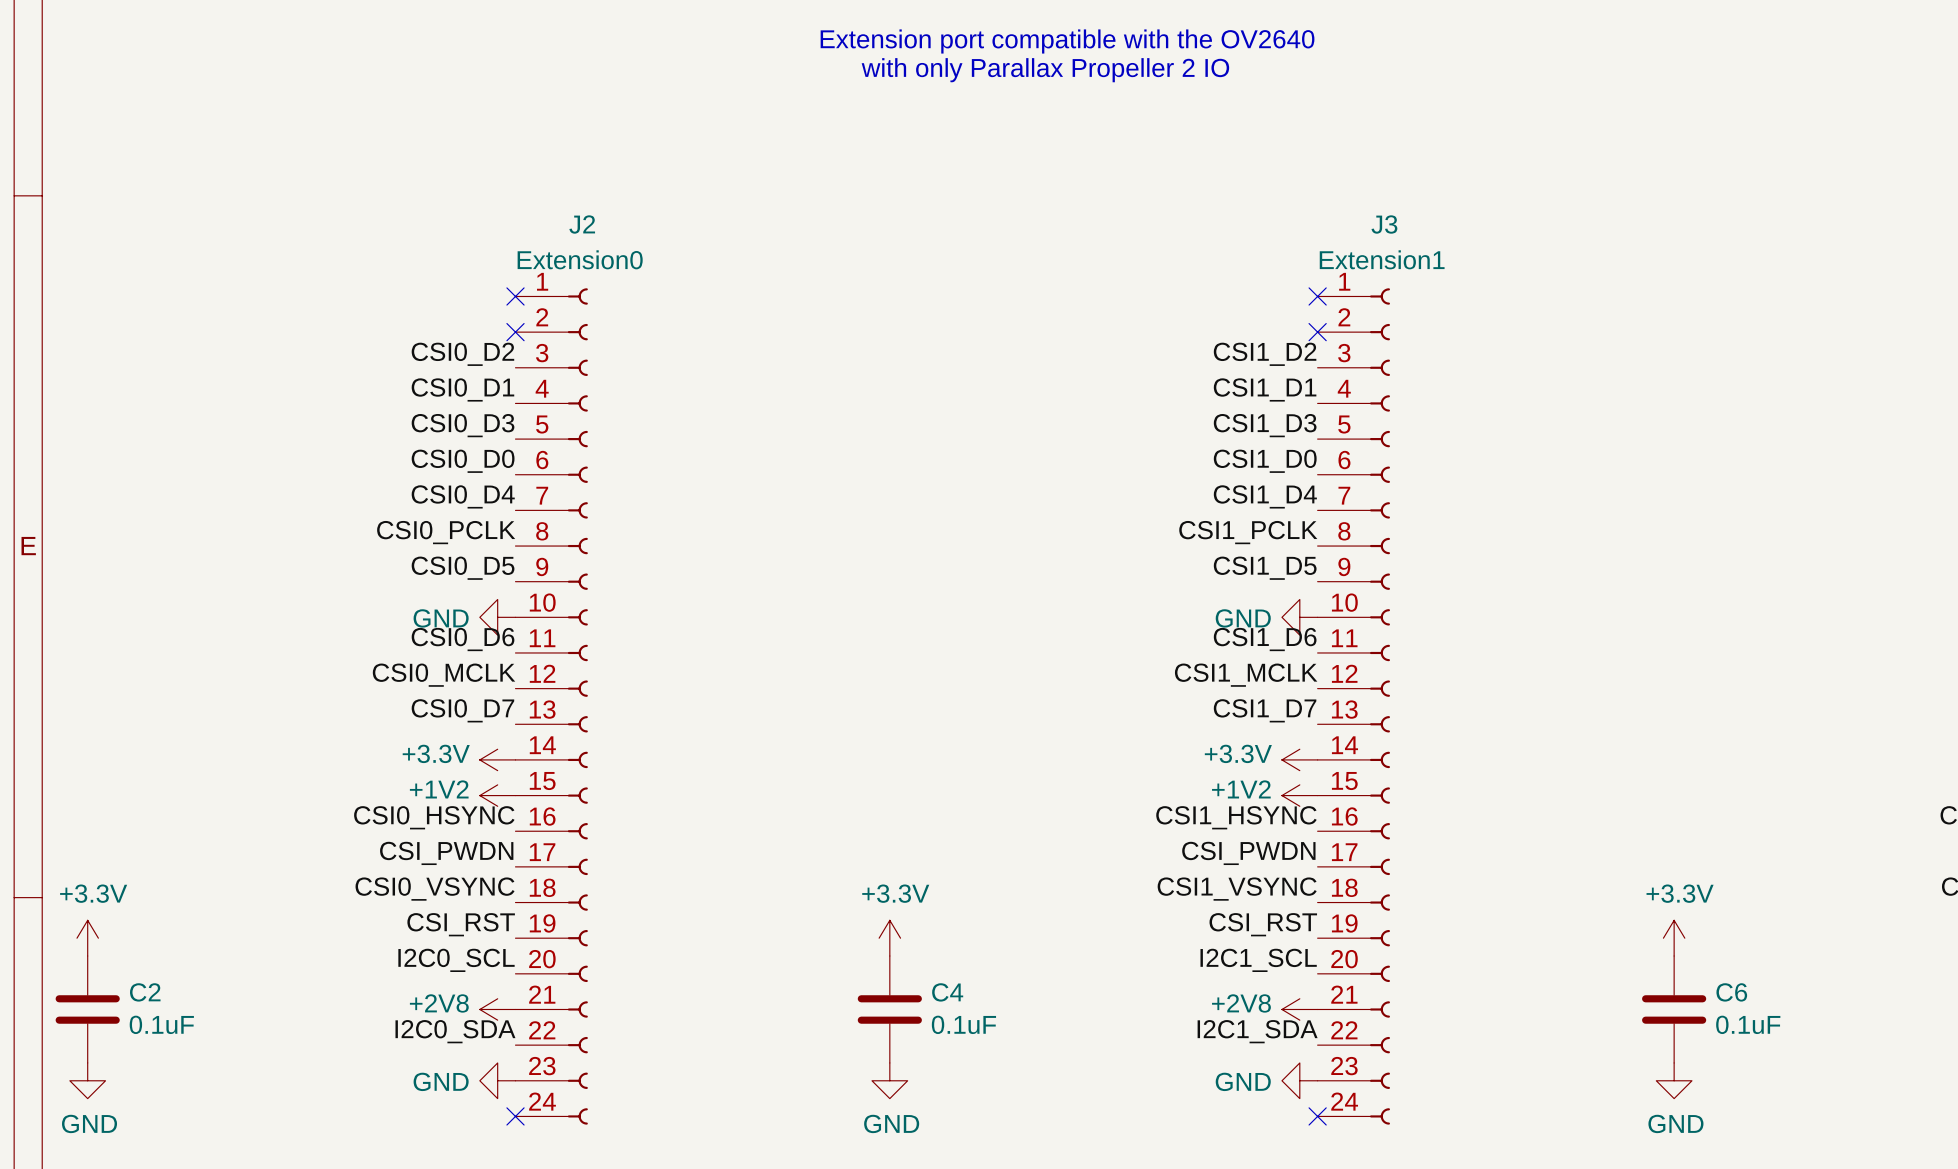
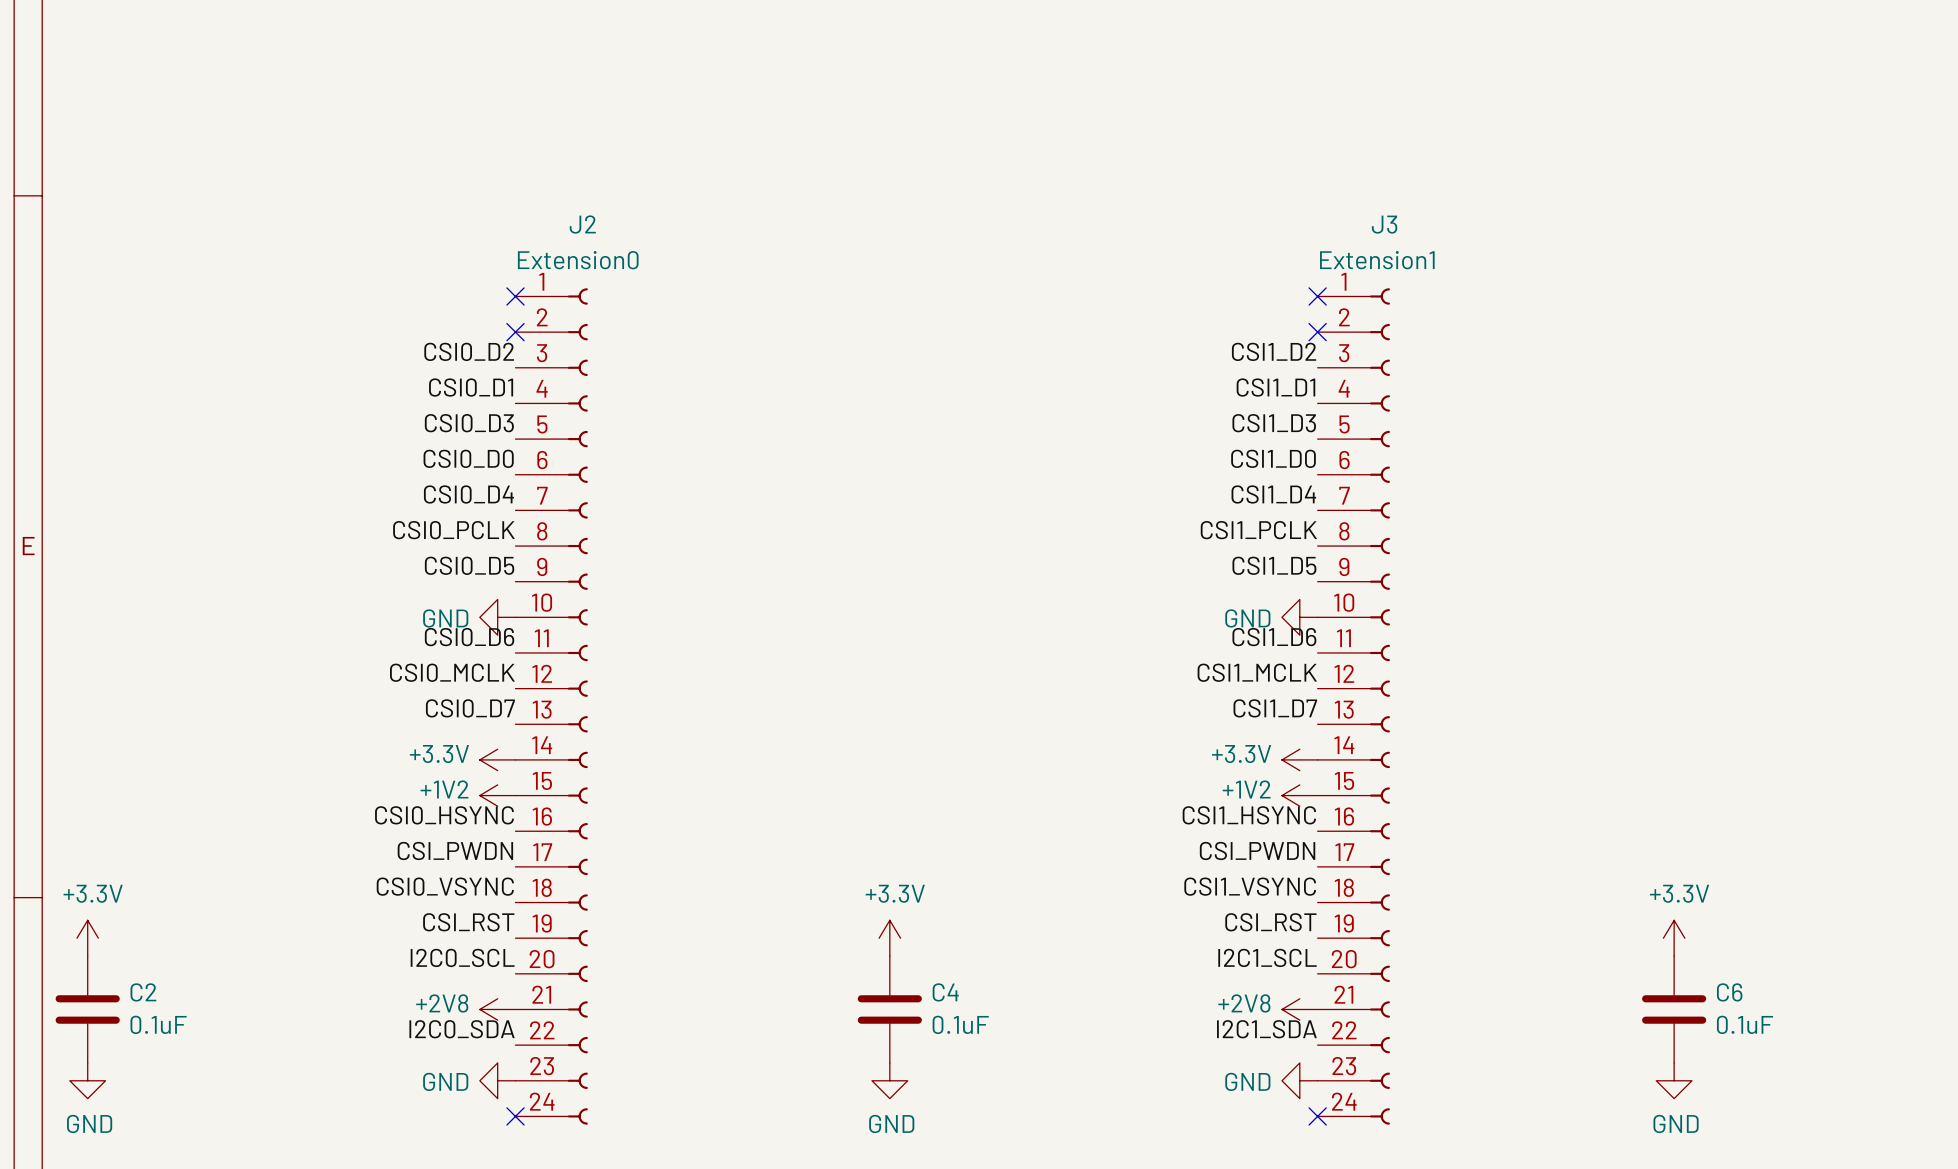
text: Extension port compatible with the OV2640 (1067, 41) -> none
text: with only Parallax Propeller 2 IO (1045, 70) -> none

